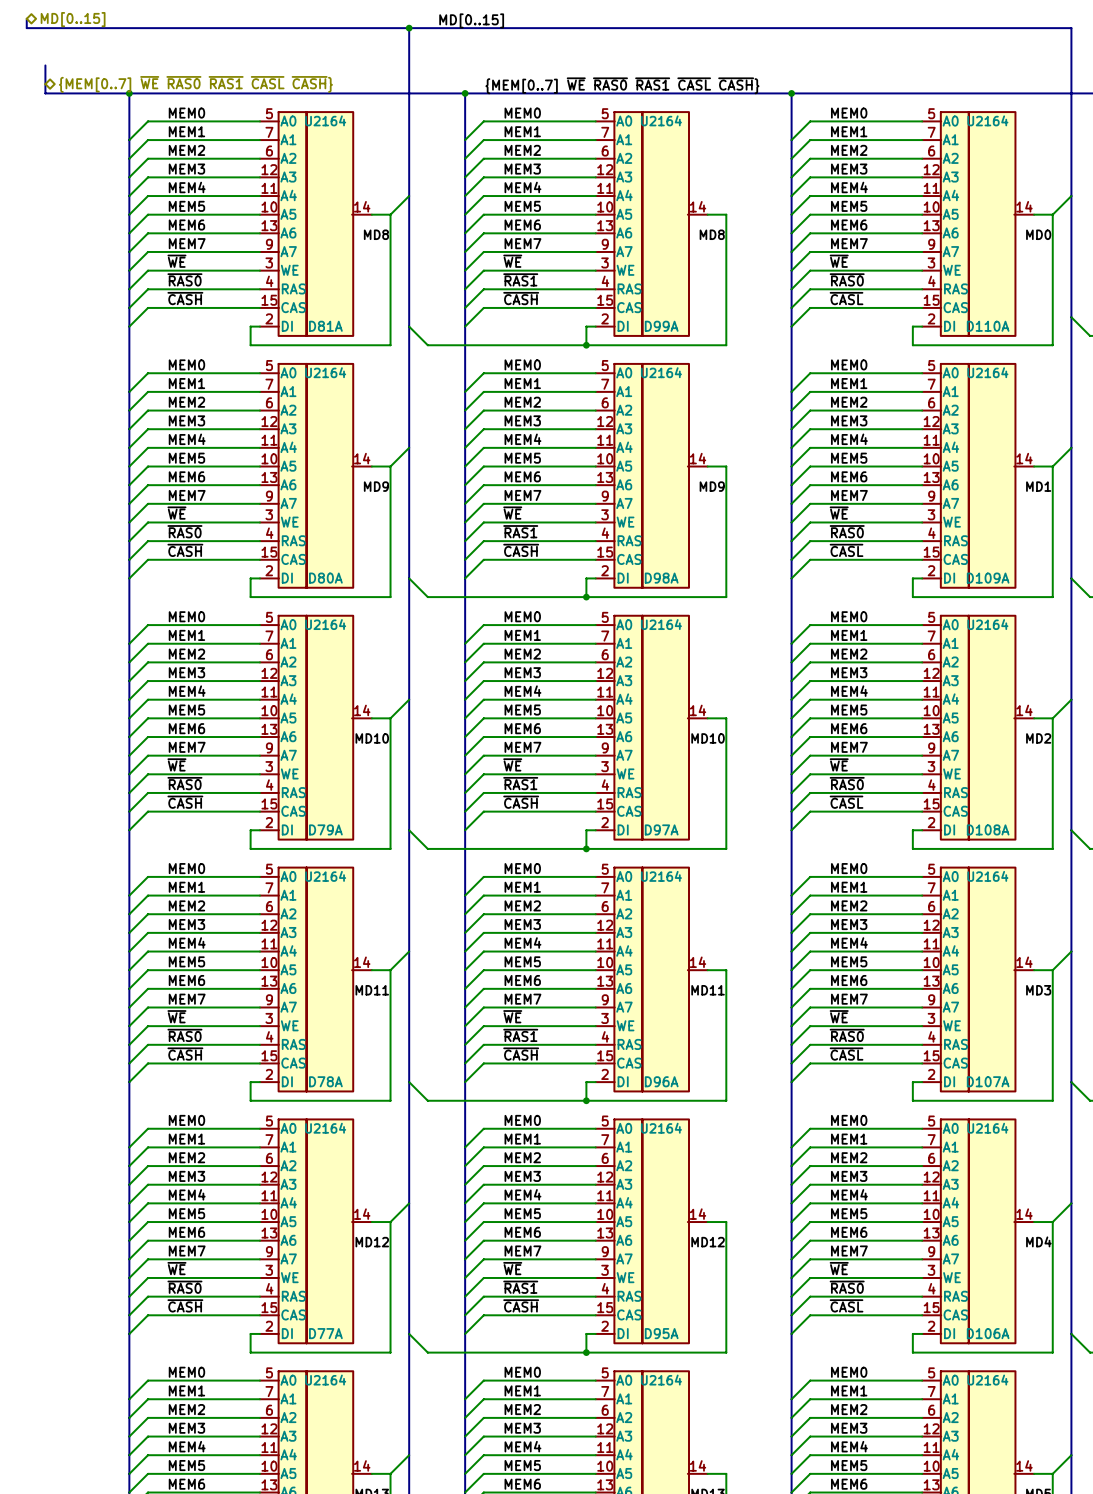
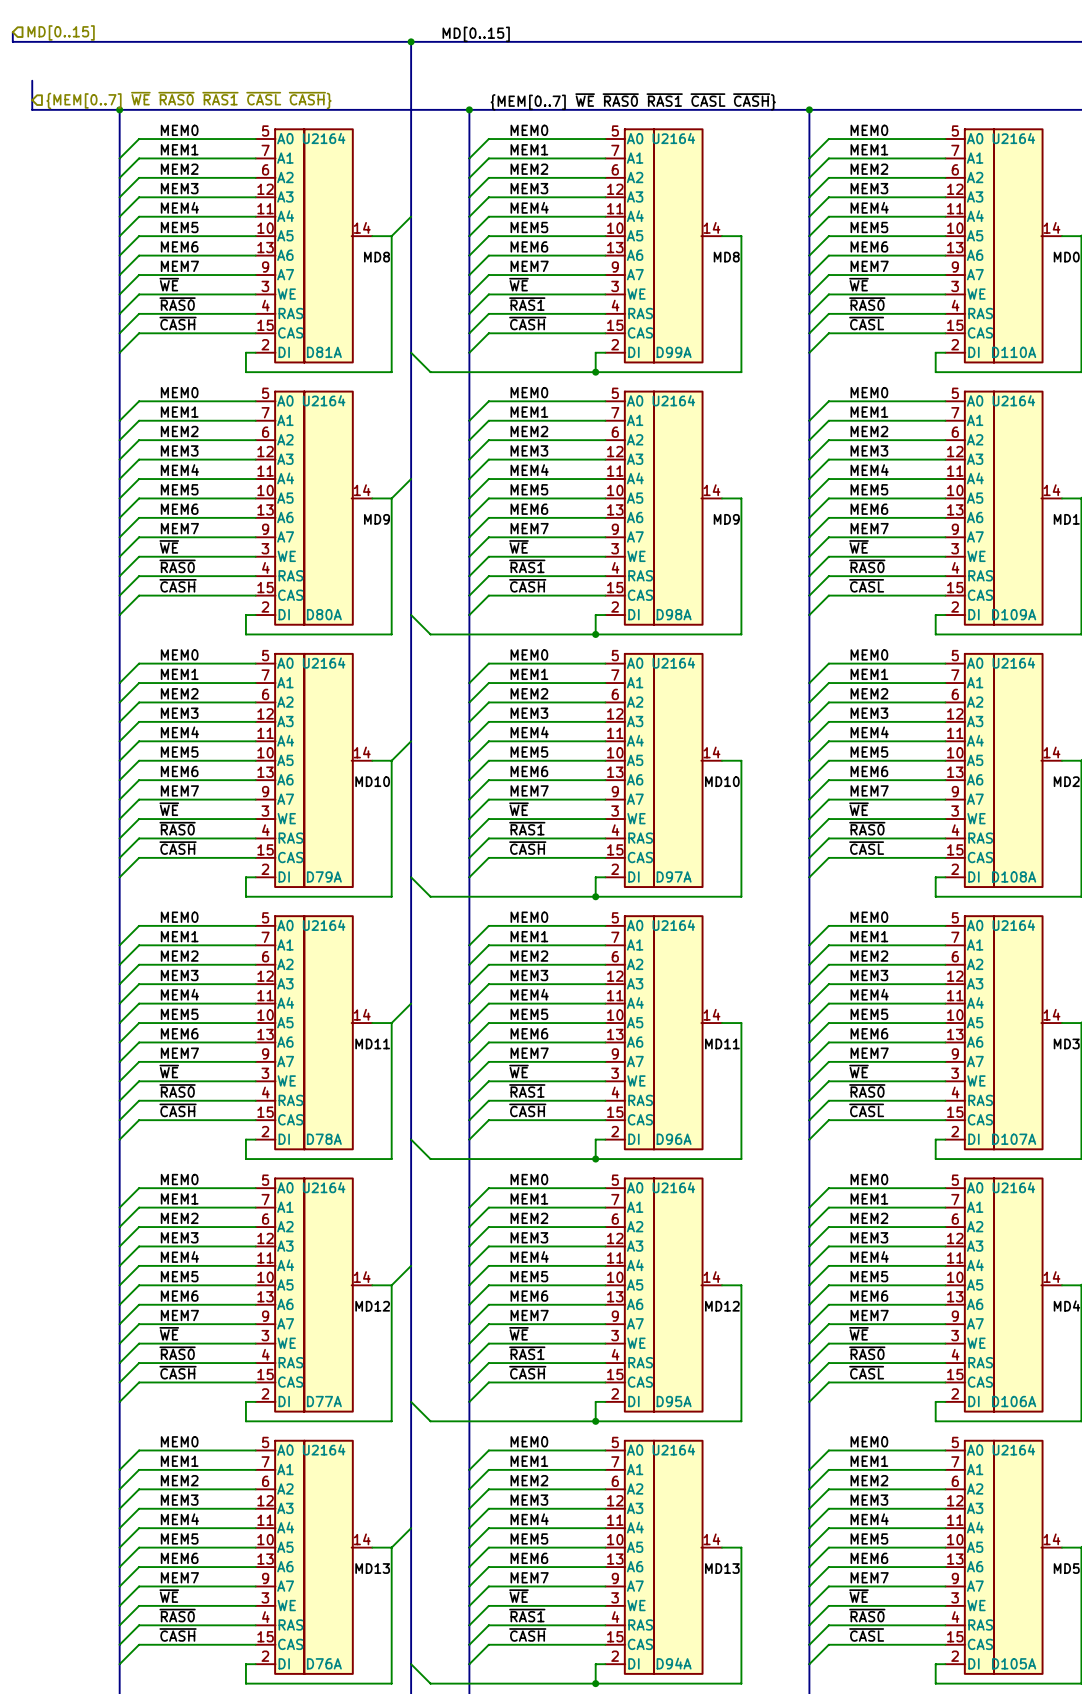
hierarchical label shape: bidirectional (73, 19) -> input (61, 32)
hierarchical label shape: bidirectional (195, 84) -> input (188, 100)

